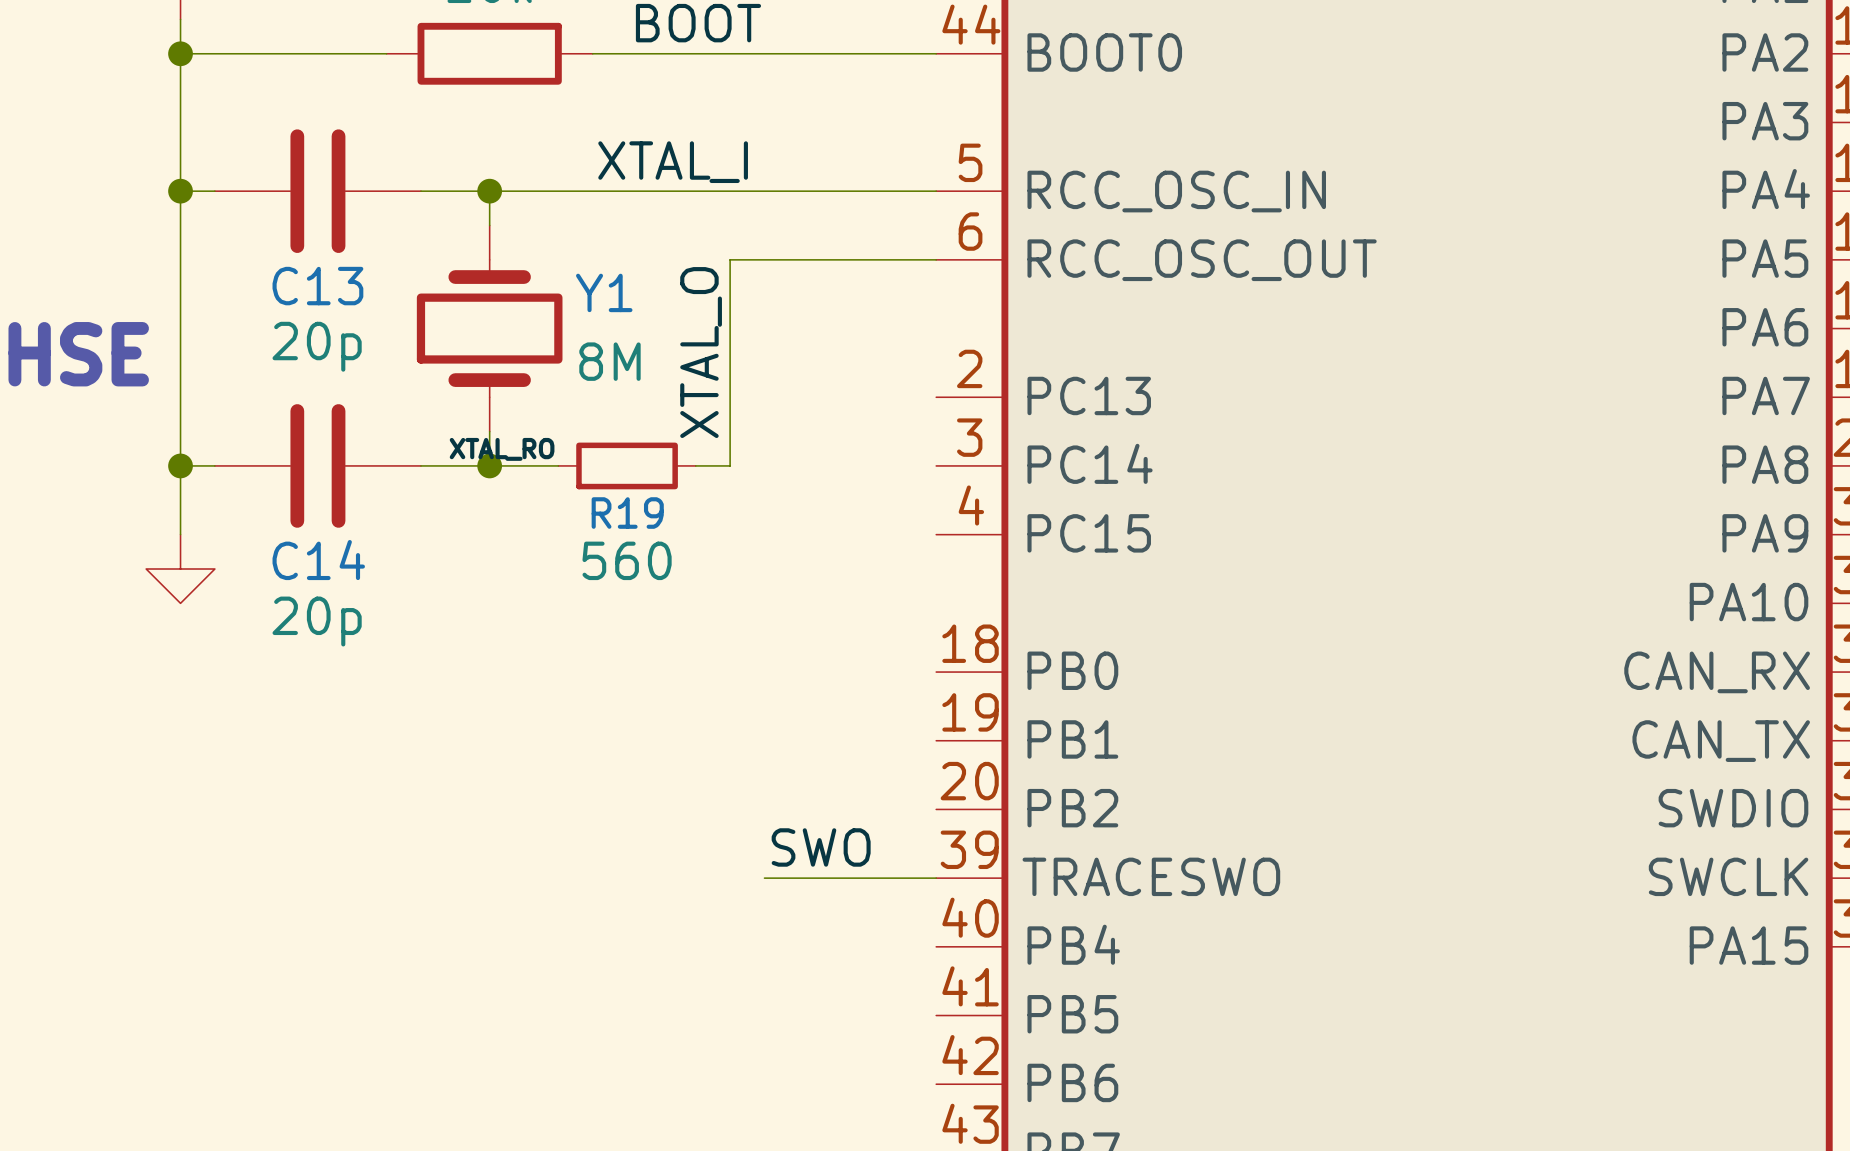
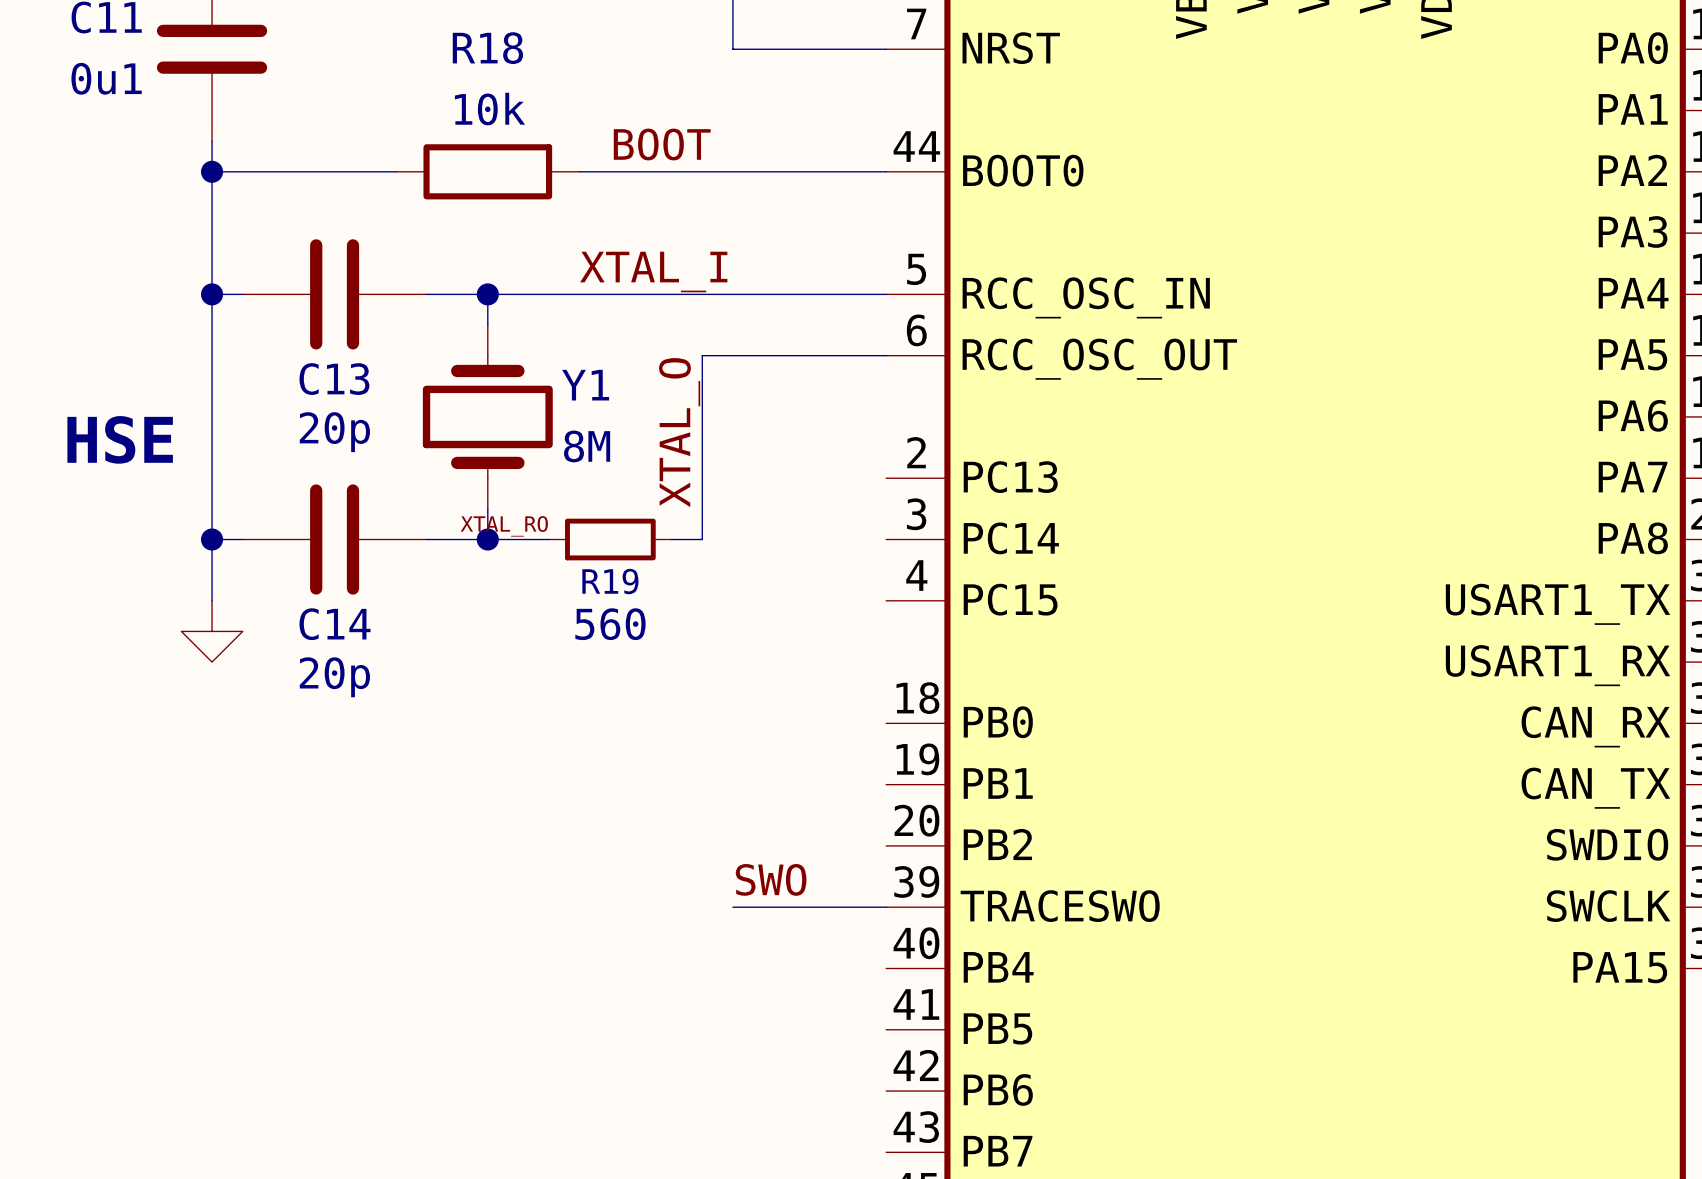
part pin name: PA9 (1765, 533) -> USART1_TX (1558, 604)
part pin name: PA10 (1749, 602) -> USART1_RX (1558, 665)

